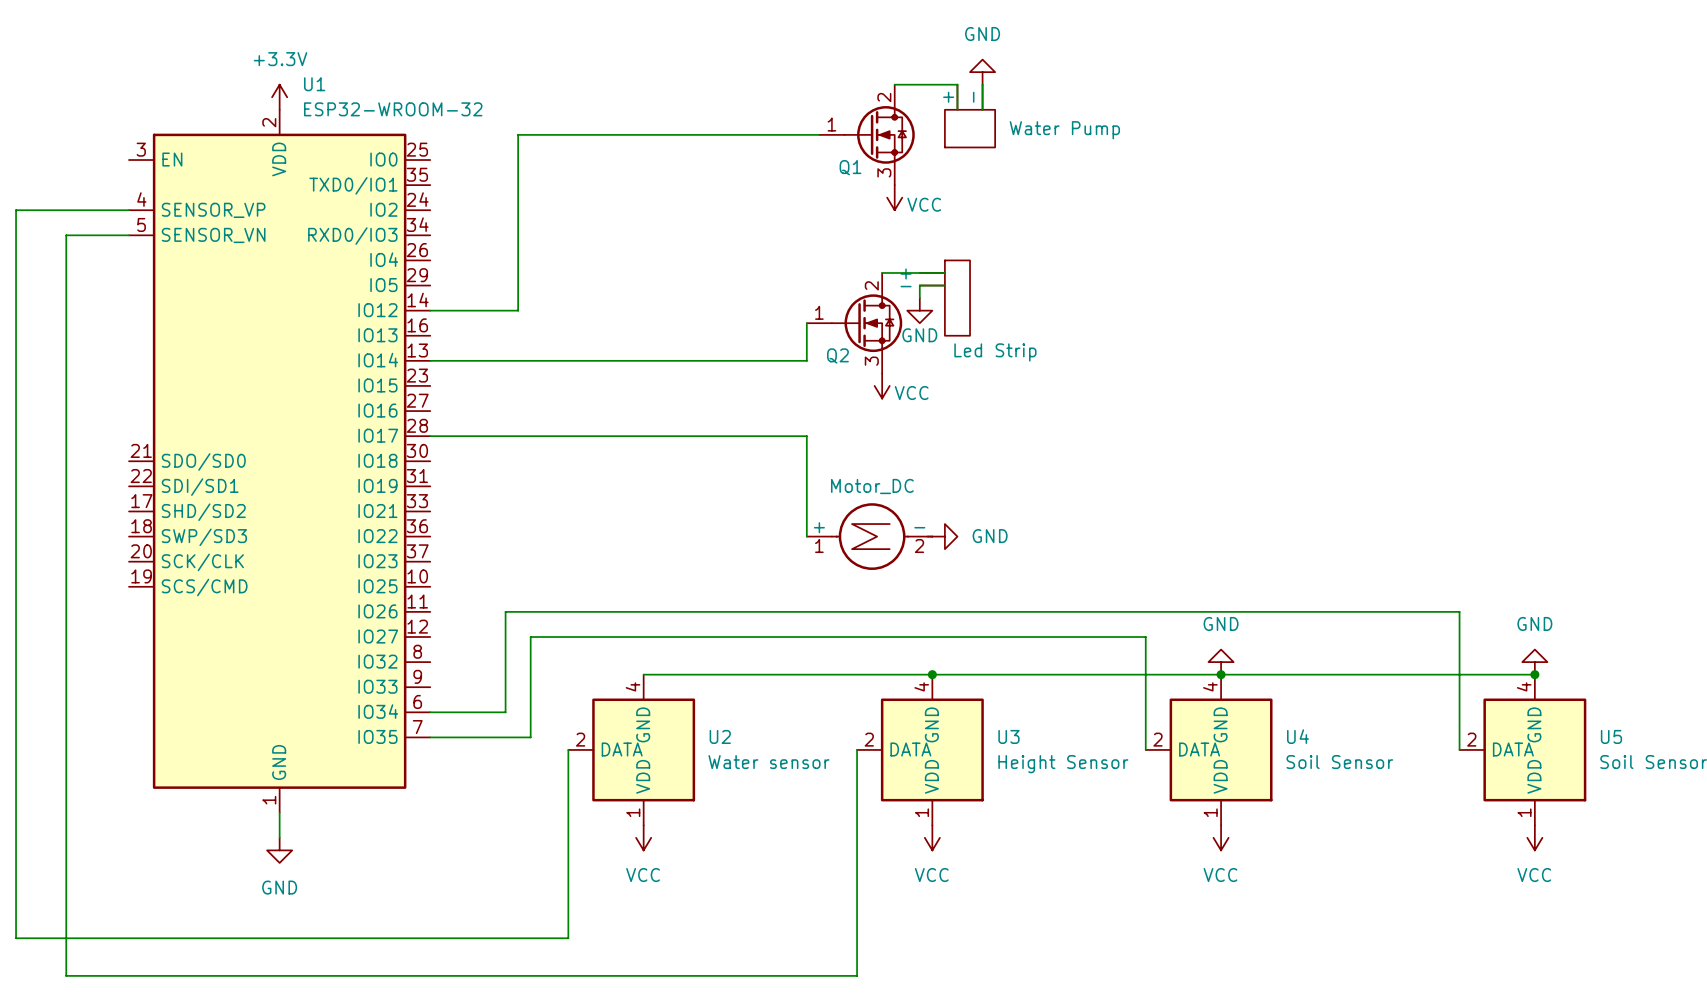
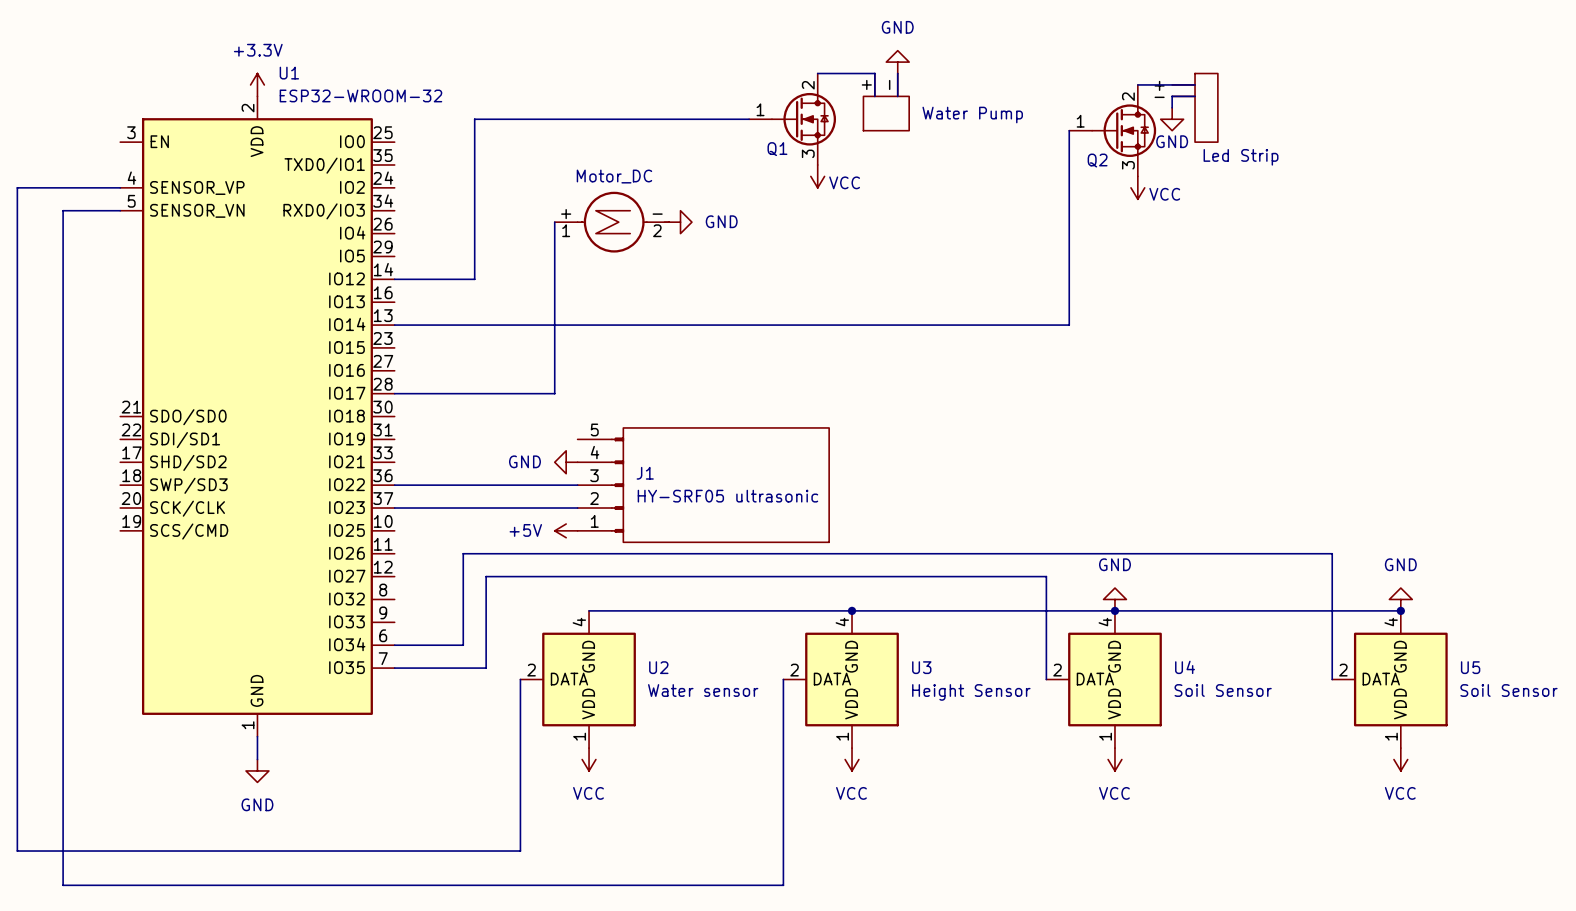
wire: none -> (1137, 84) (1195, 84)
wire: none -> (1195, 96) (1172, 96) (1172, 107)
part: none -> Led Strip (1195, 107)
power symbol: none -> GND (1172, 119)
power symbol: none -> VCC (1137, 187)
part: none -> Motor_DC (611, 222)
power symbol: none -> GND (680, 222)
wire: (882, 272) (944, 272) -> none
wire: (944, 285) (919, 285) (919, 298) -> none
part: Led Strip (944, 298) -> none
power symbol: GND (919, 310) -> none
wire: (806, 323) (806, 360) -> (1069, 130) (1069, 325) (737, 325)
Q2 position: (854, 323) -> (1112, 130)
power symbol: VCC (882, 385) -> none
wire: (606, 436) (806, 436) (806, 536) -> (554, 393) (554, 222)
power symbol: none -> GND (566, 462)
wire: none -> (394, 485) (577, 485)
J1: none -> HY-SRF05 ultrasonic (703, 485)
part: Motor_DC (869, 536) -> none
power symbol: GND (944, 536) -> none
wire: none -> (394, 508) (577, 508)
power symbol: none -> +5V (566, 530)

